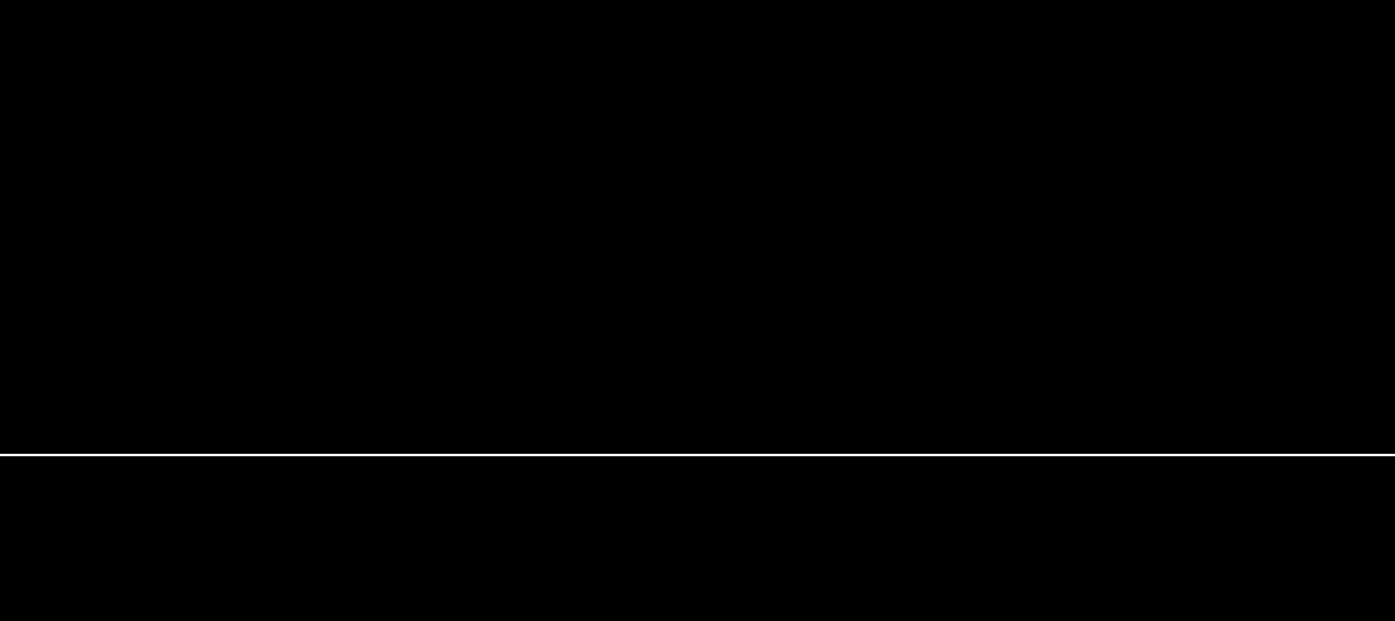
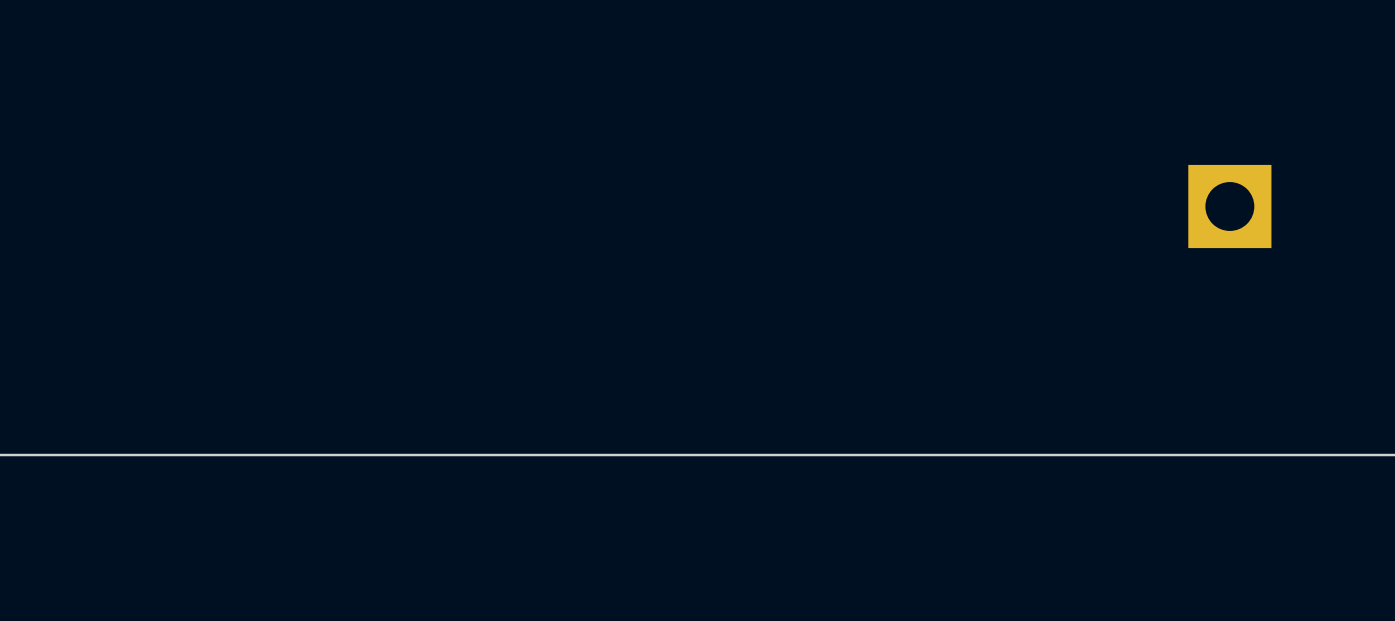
part: none -> (1229, 206)

